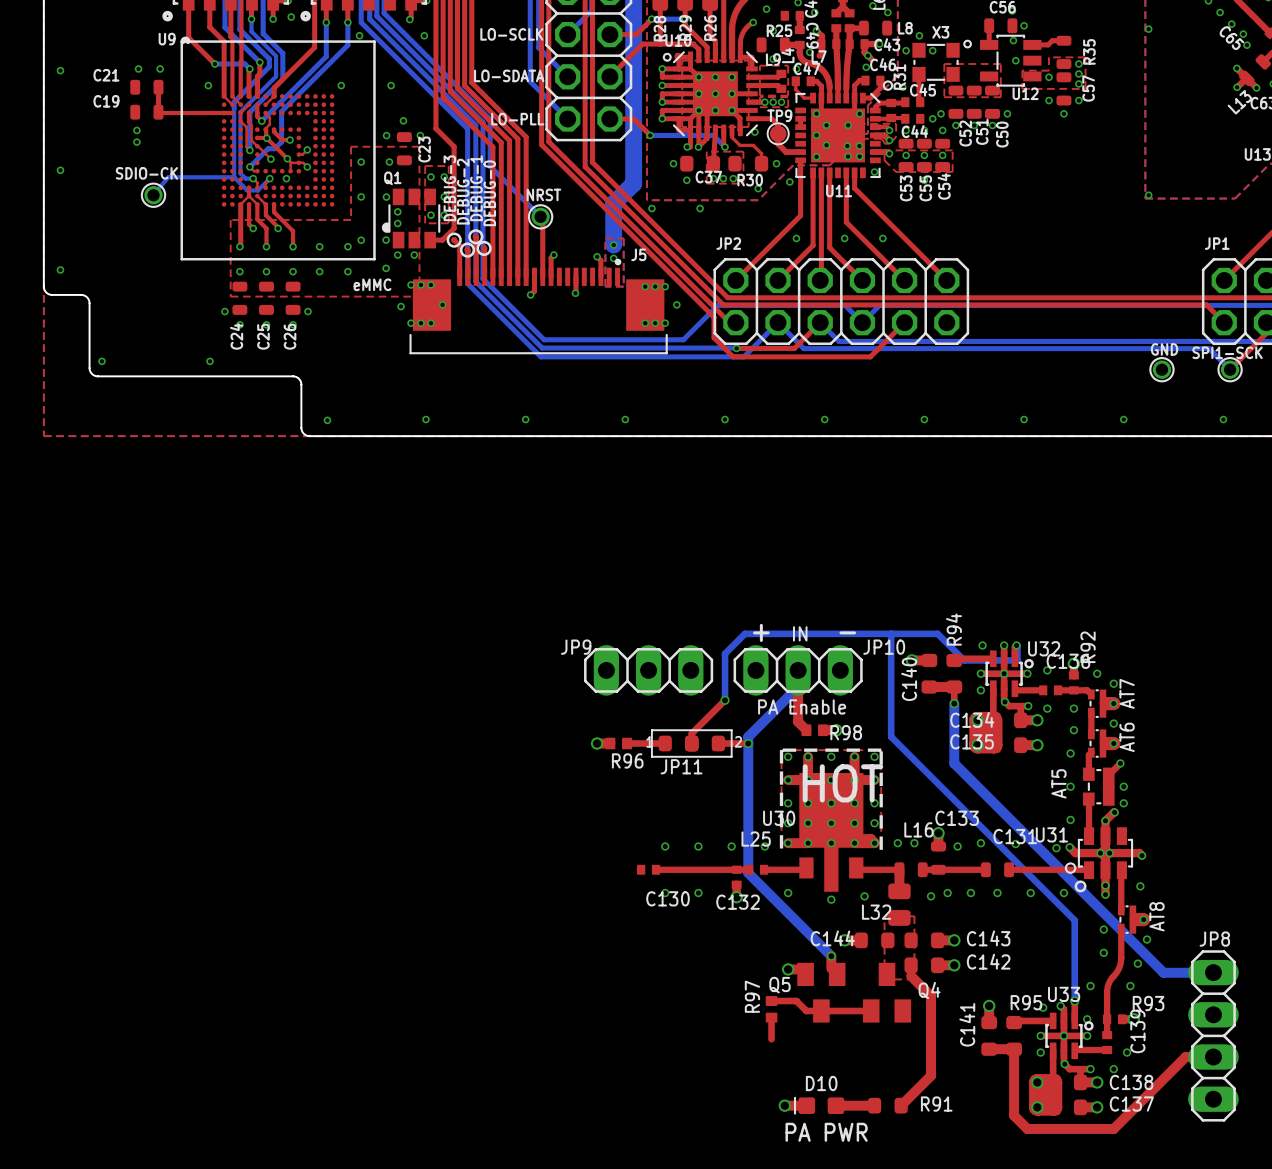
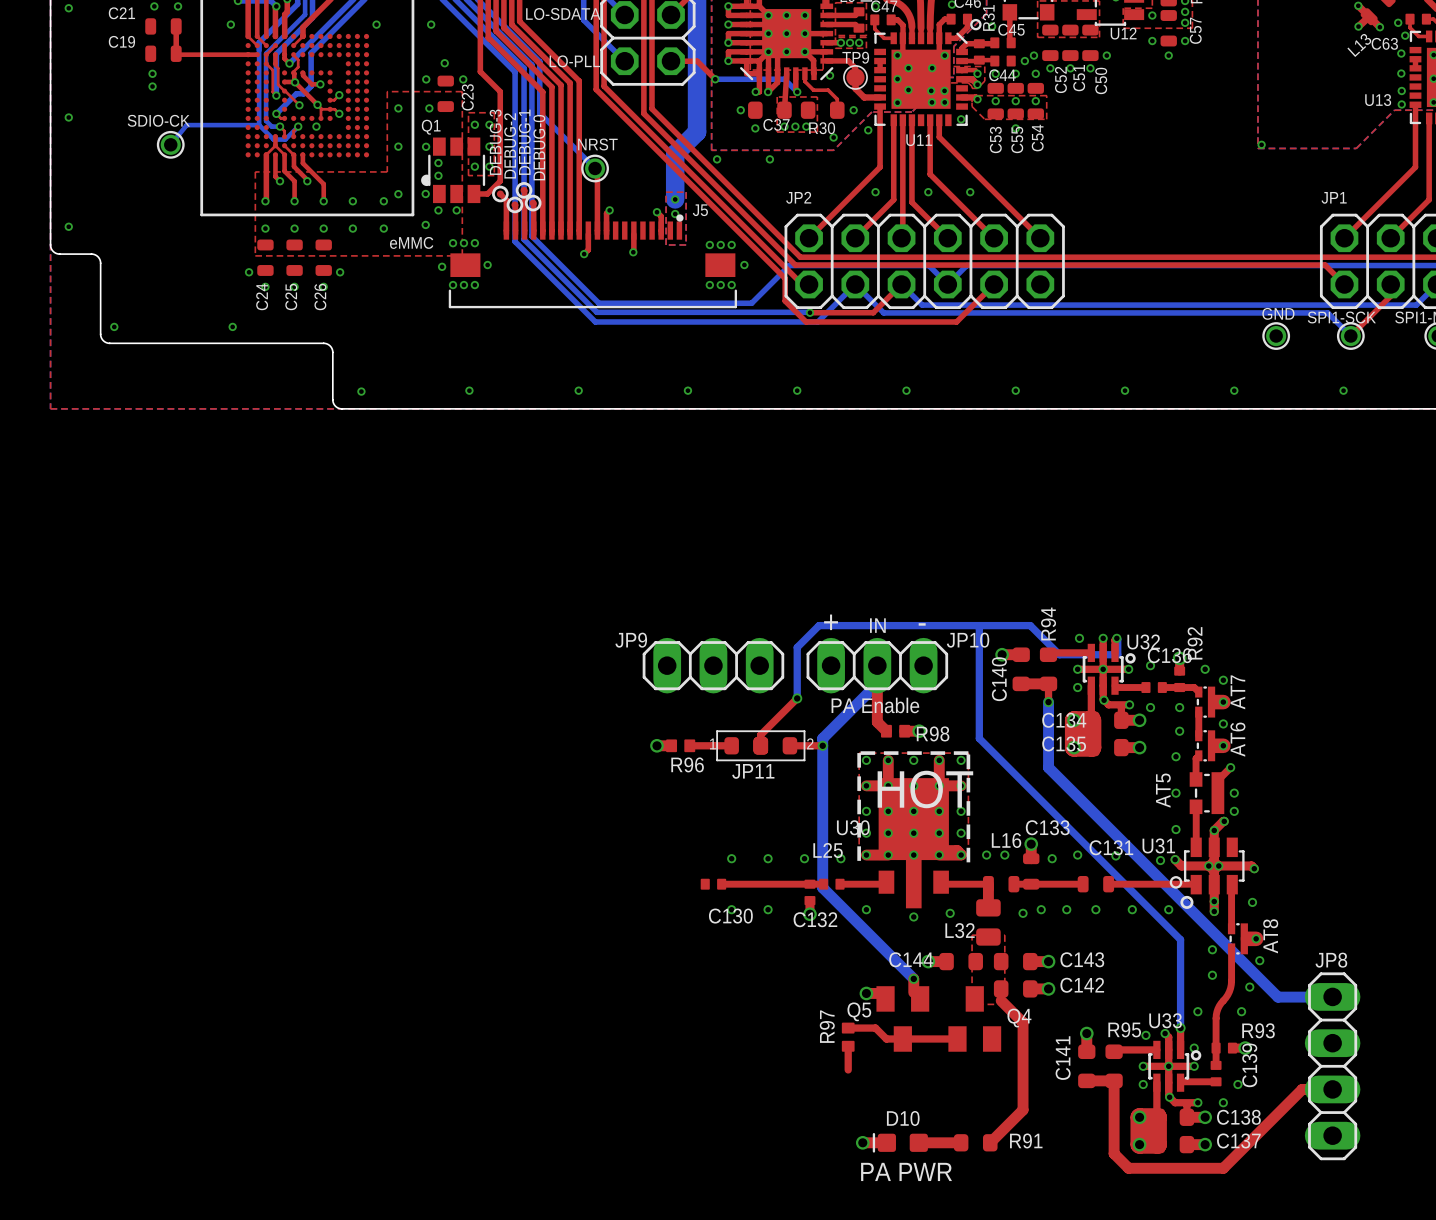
J5 footprint: [409, 258, 668, 355] -> [448, 214, 738, 309]

